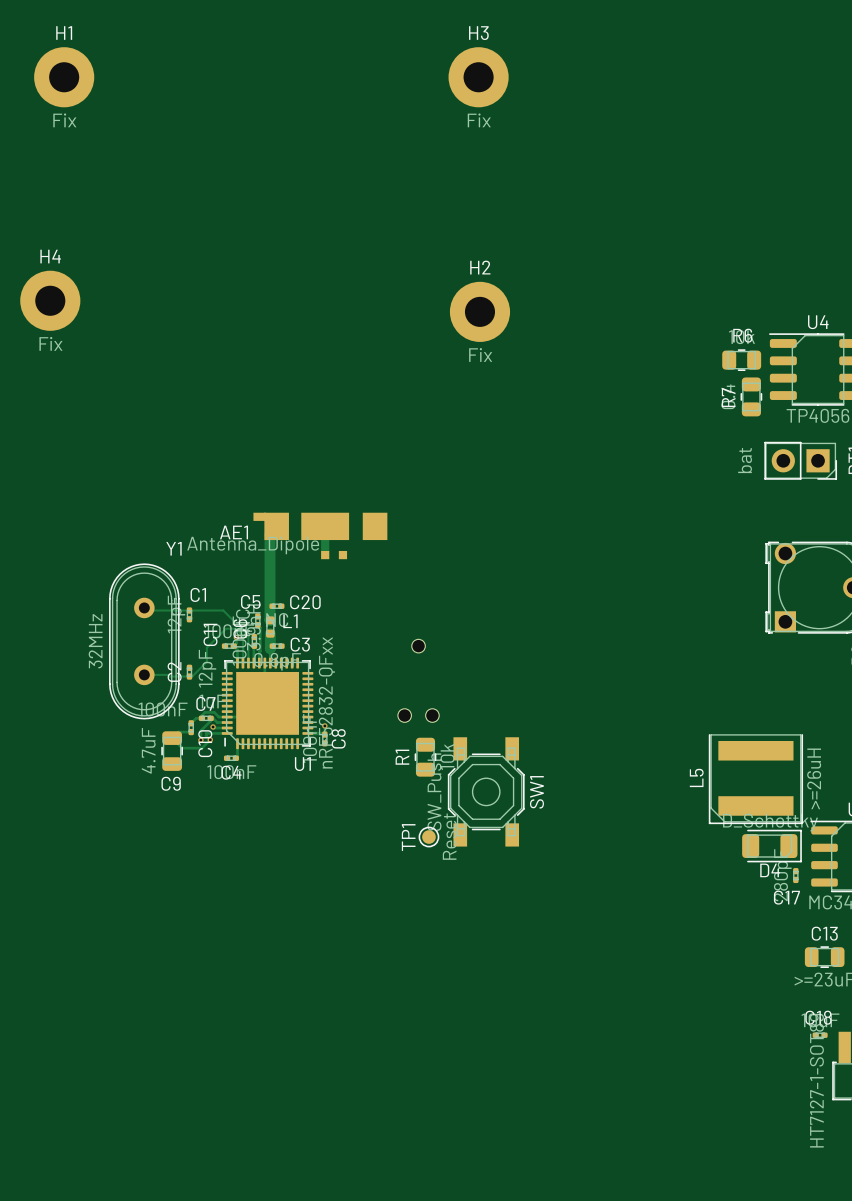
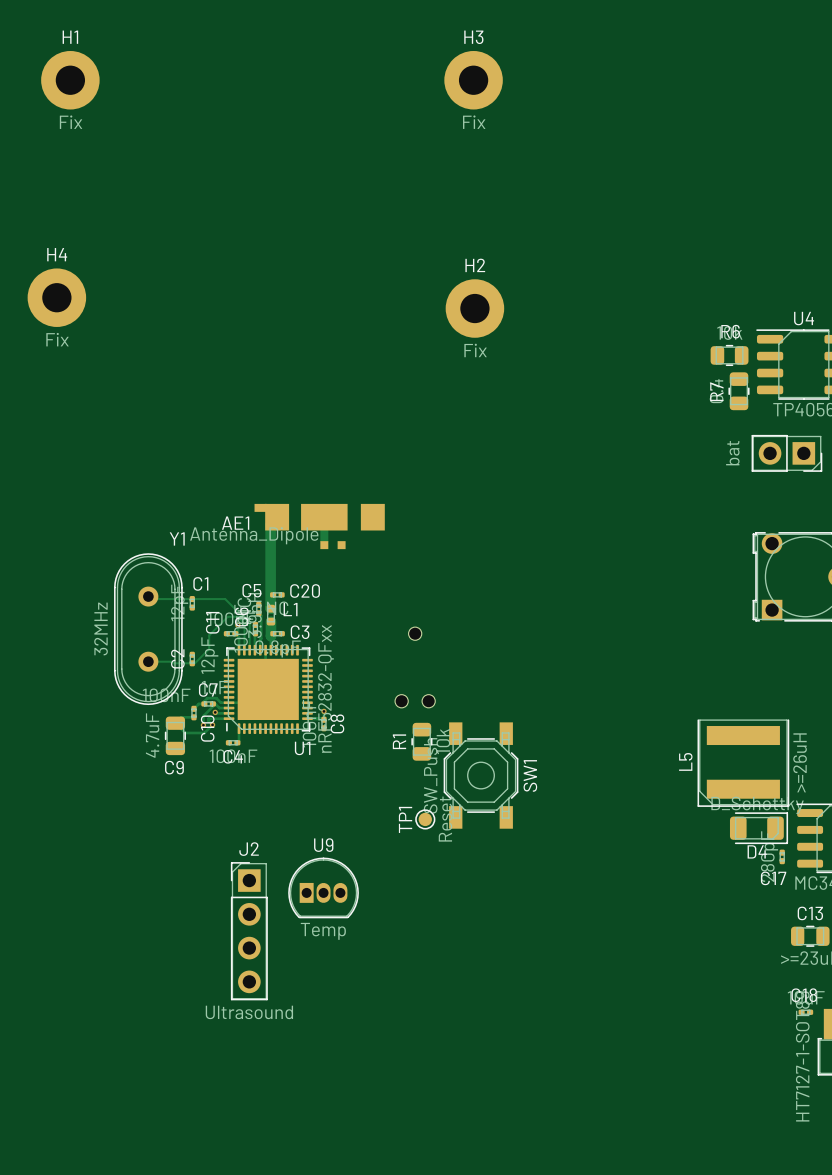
U9: none -> Temp (323, 887)
J2: none -> Ultrasound (249, 931)

